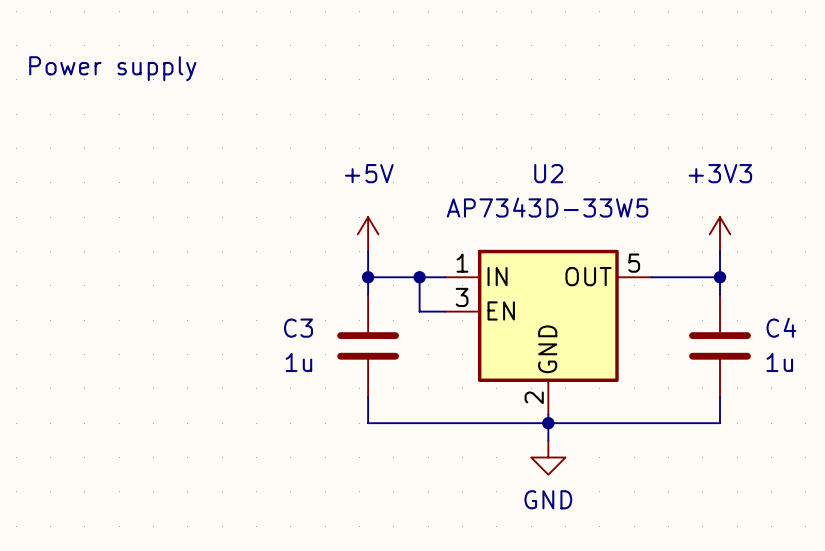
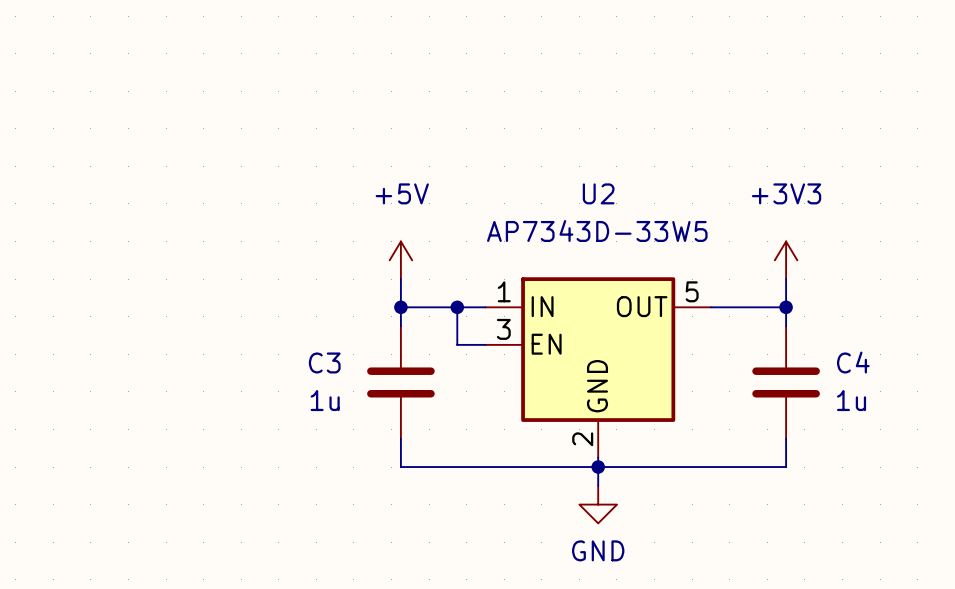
text: Power supply (112, 68) -> none

